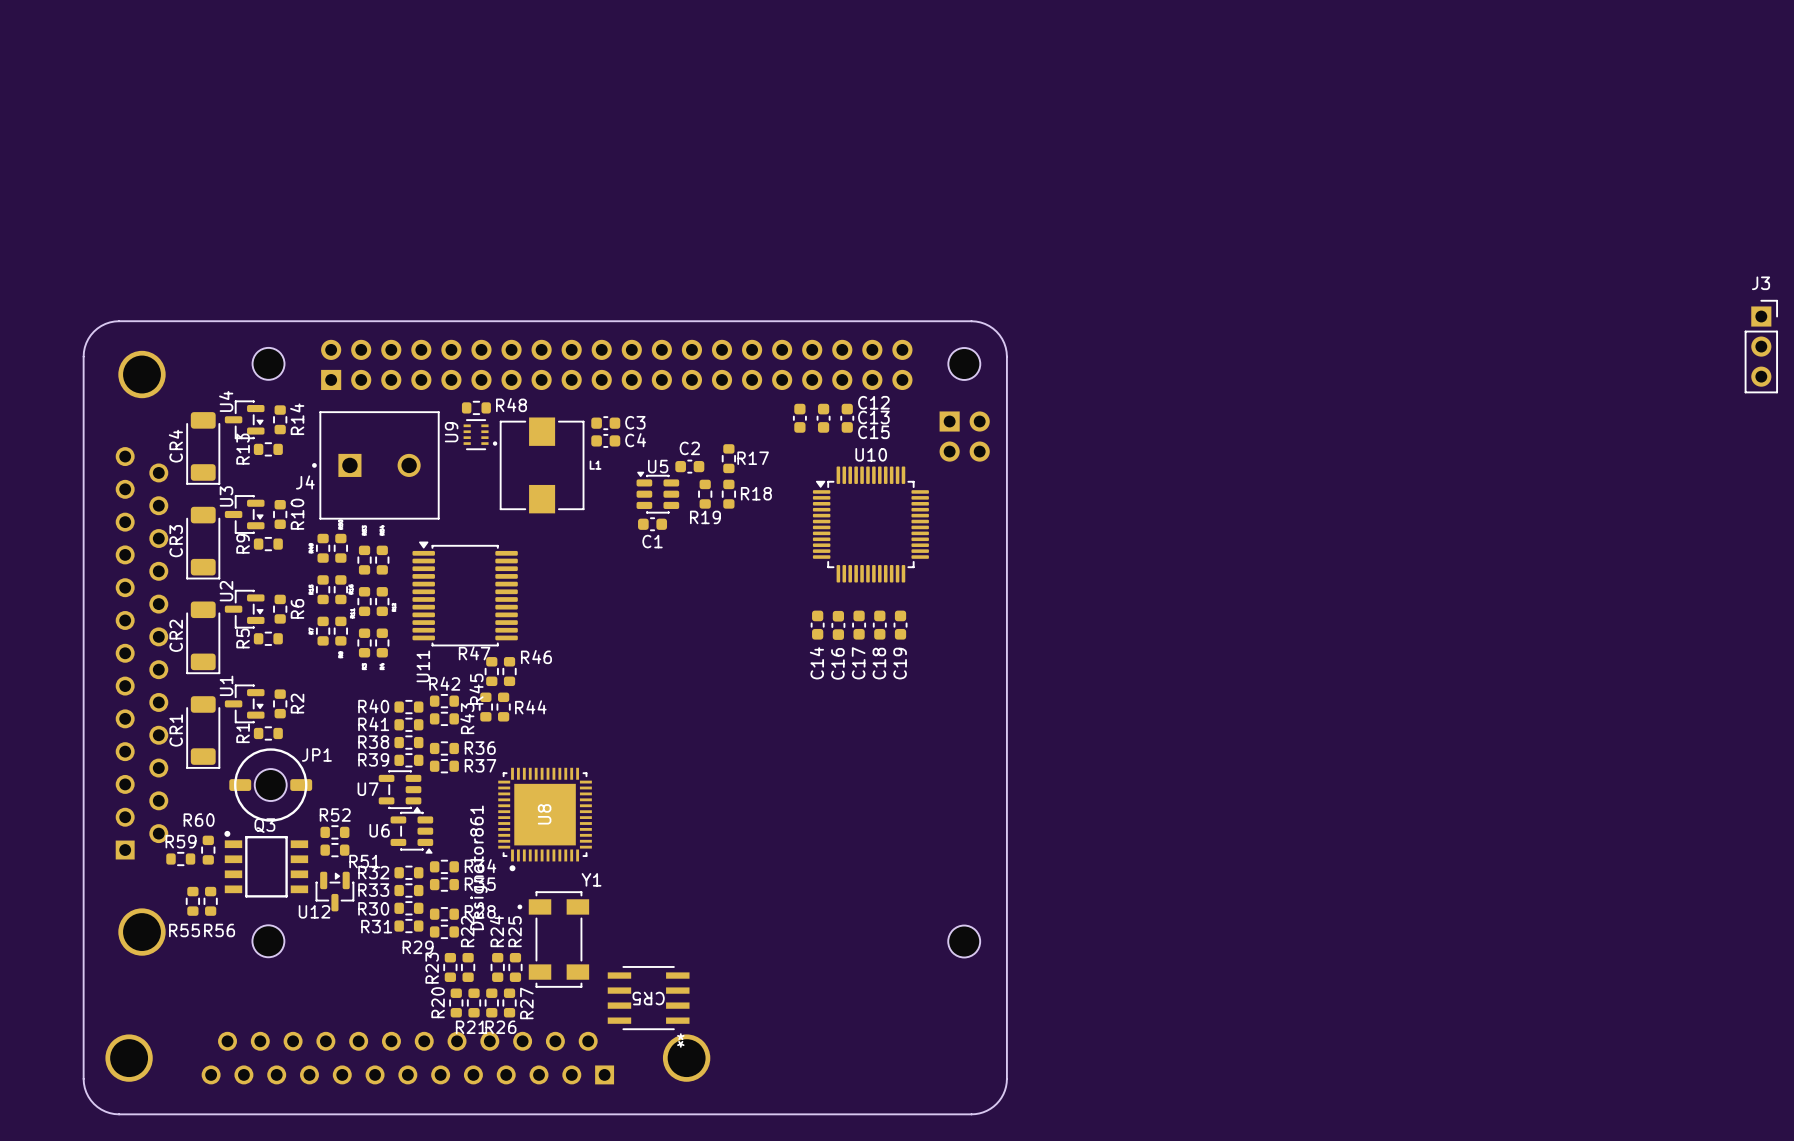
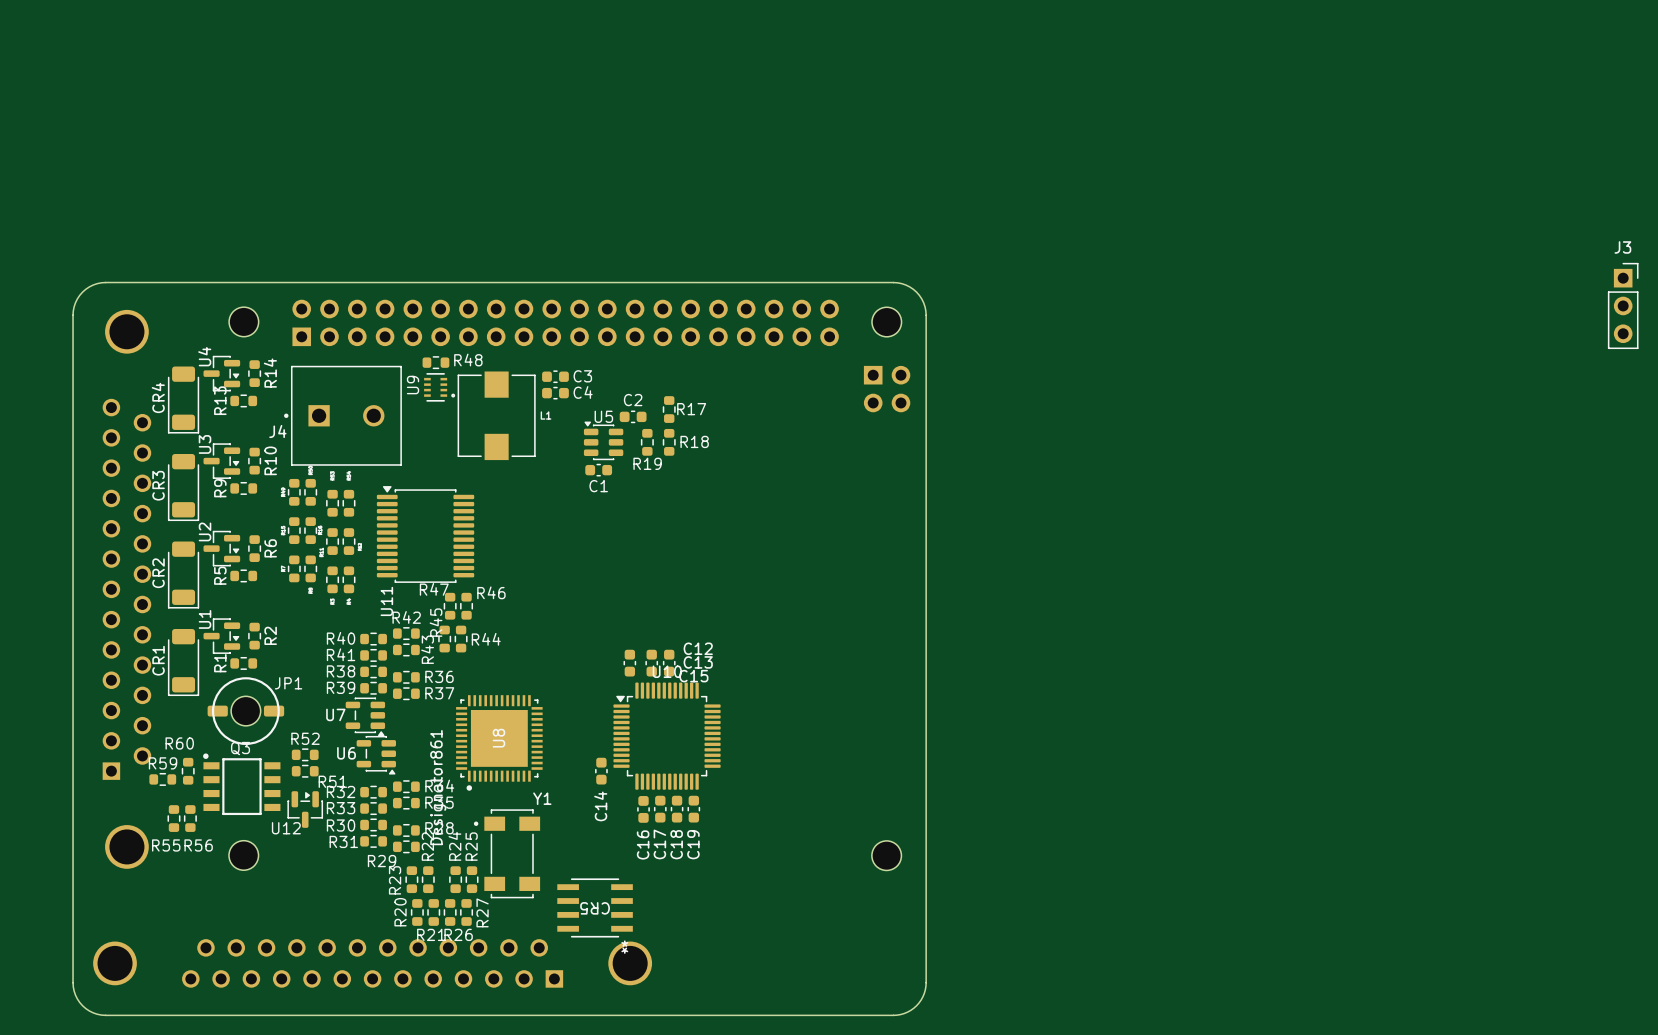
C12 position: (799, 418) -> (629, 663)
C13 position: (823, 418) -> (651, 663)
C15 position: (847, 418) -> (669, 663)
U10 position: (870, 524) -> (667, 736)
C14 position: (817, 625) -> (601, 771)
C16 position: (838, 625) -> (643, 809)
C17 position: (859, 625) -> (660, 809)
C18 position: (879, 625) -> (677, 809)
C19 position: (900, 625) -> (693, 809)

